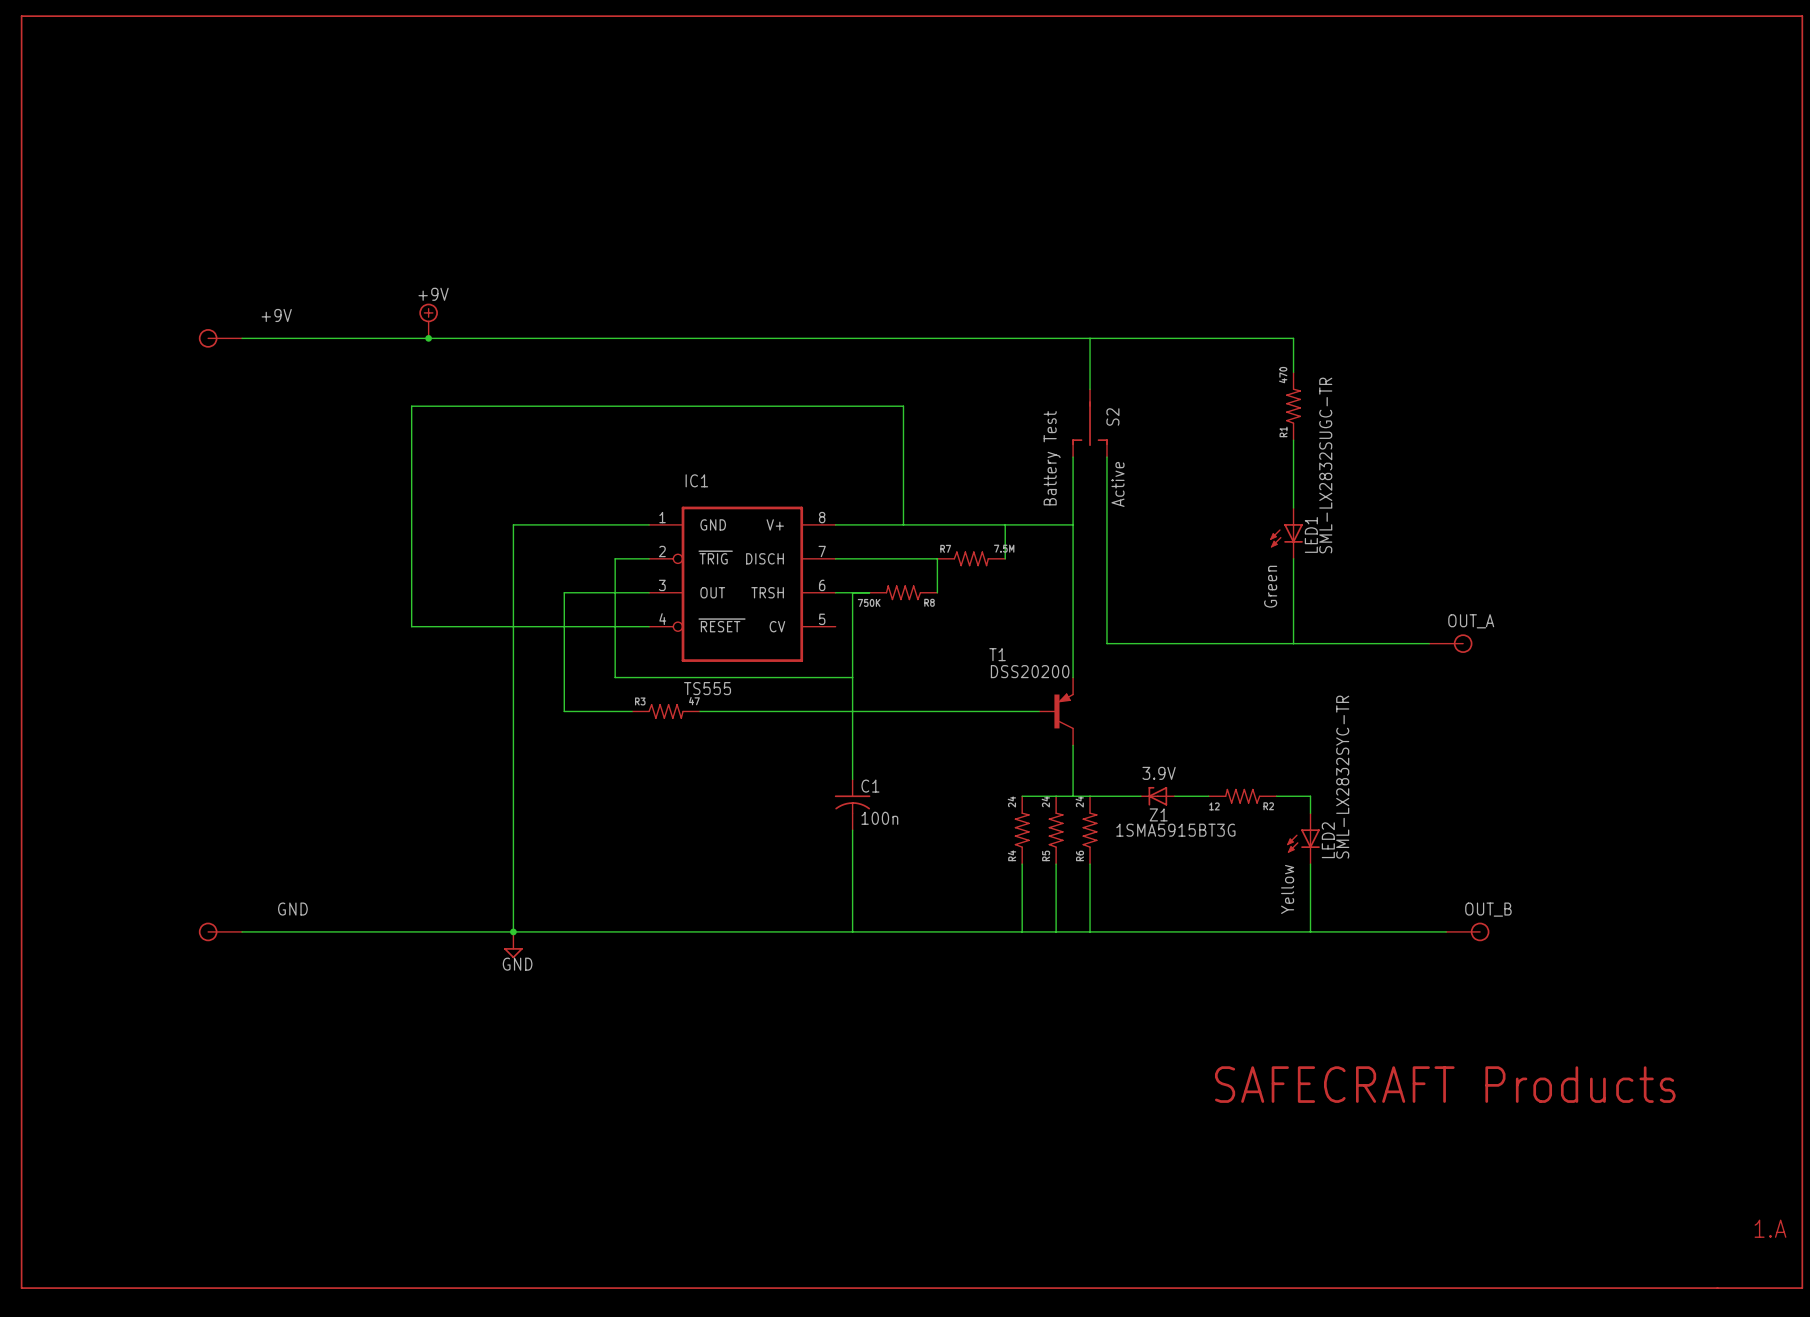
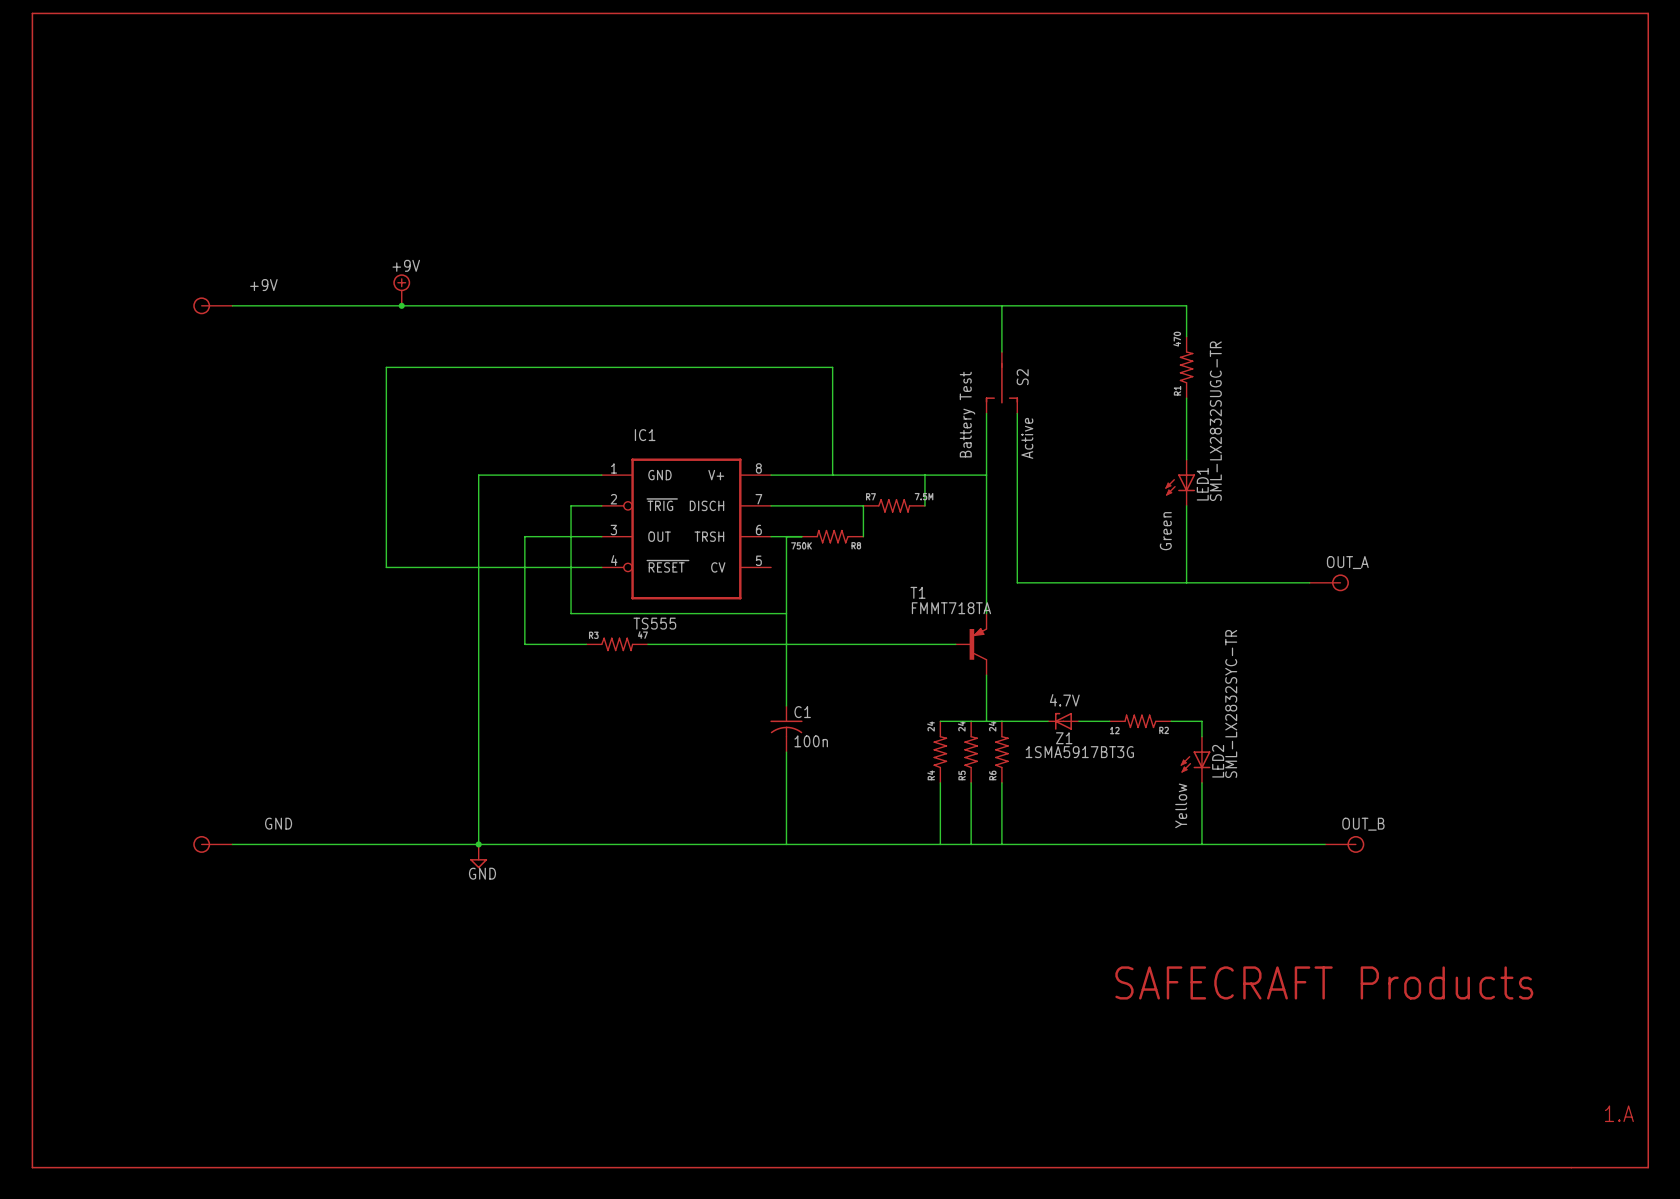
T1 value: DSS20200 (1030, 671) -> FMMT718TA (951, 608)
text: 3.9V (1159, 773) -> 4.7V (1064, 700)
Z1 value: 1SMA5915BT3G (1175, 830) -> 1SMA5917BT3G (1079, 752)

